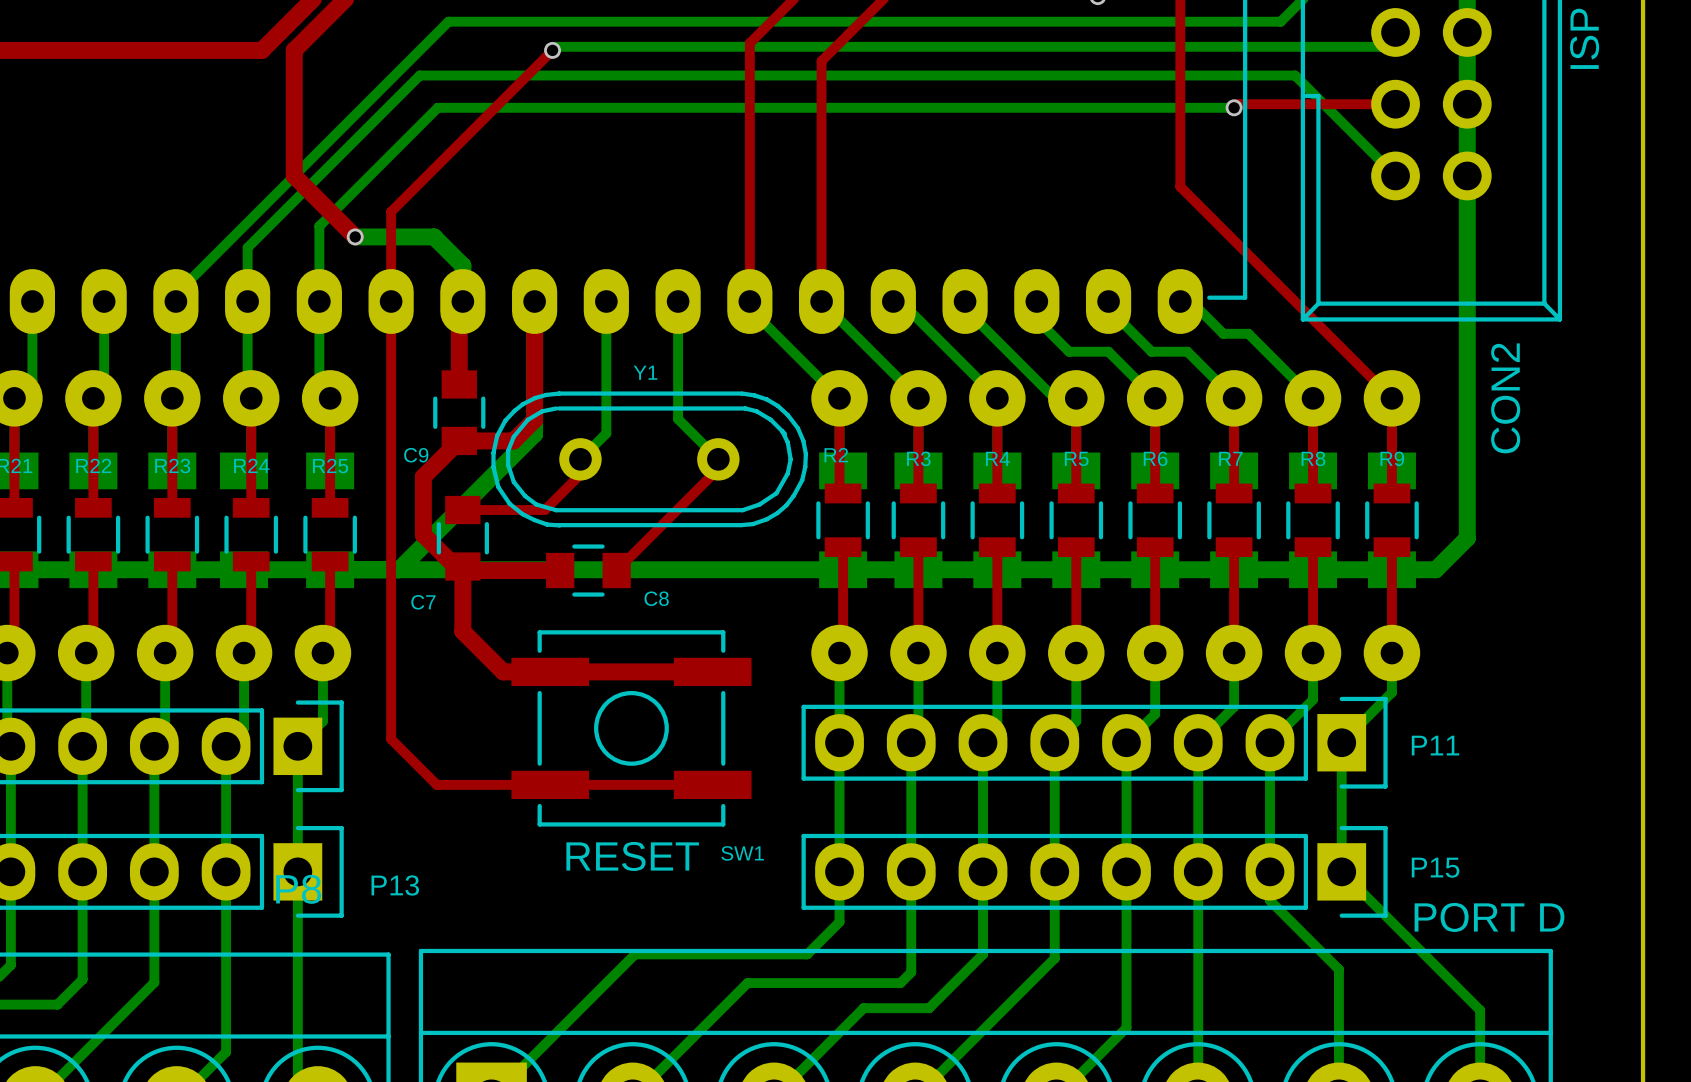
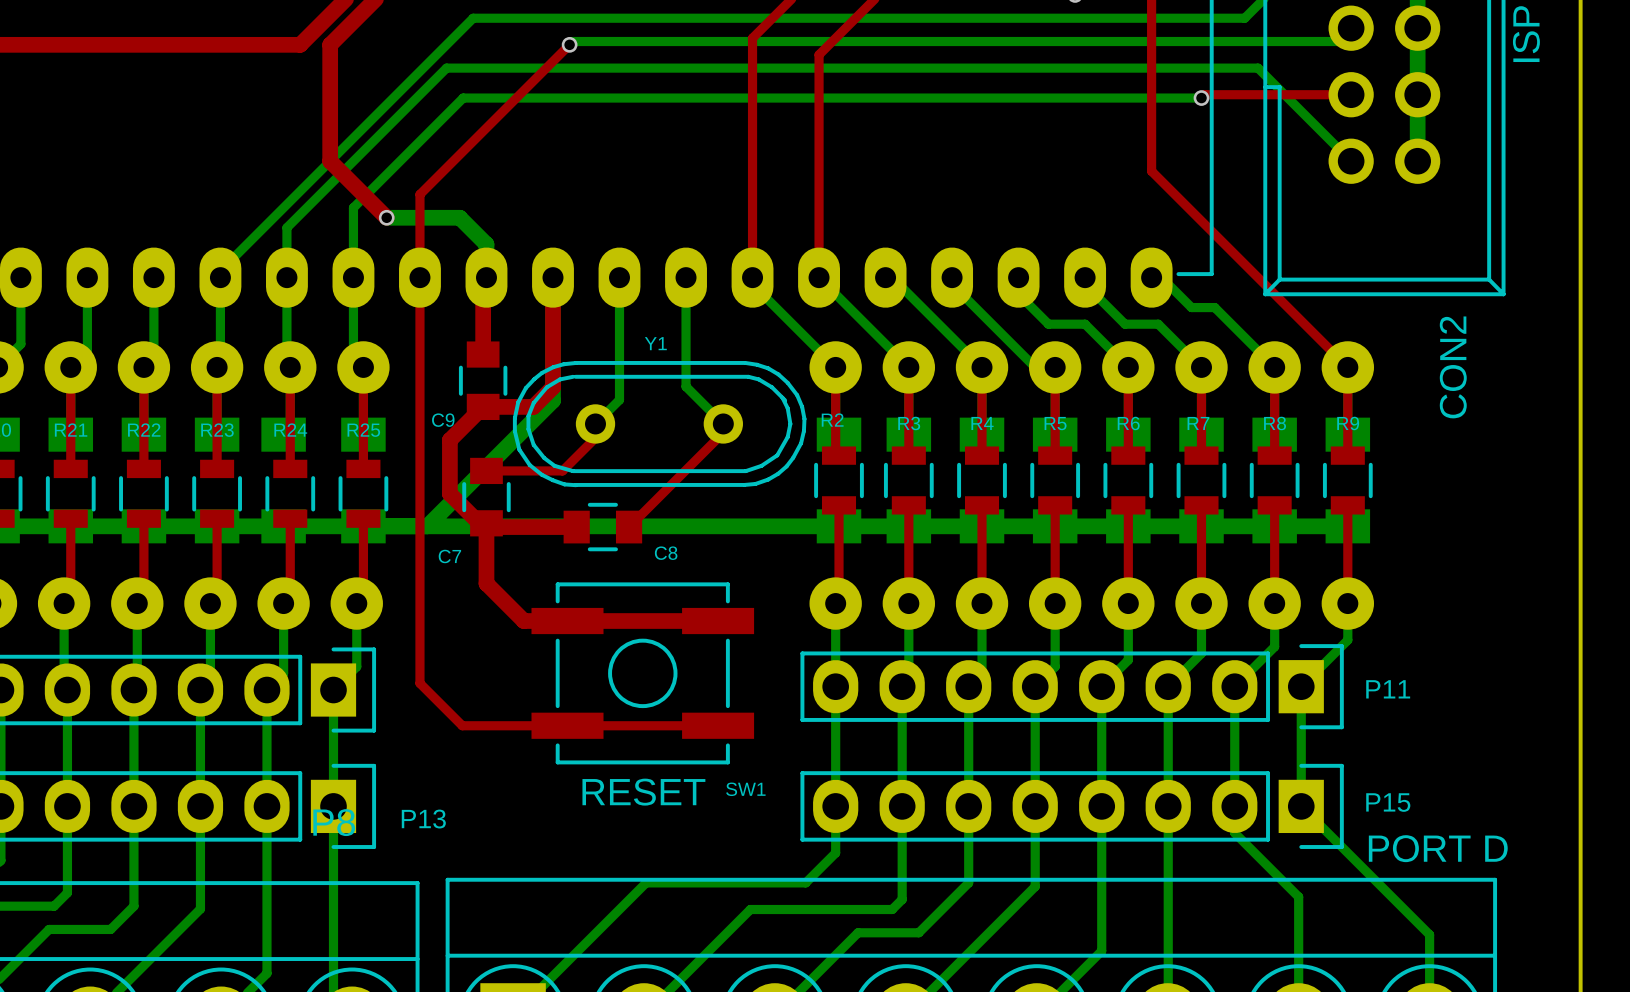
bottom track: (1467, 175) (1467, 538) (1435, 569) (1391, 569) -> none

